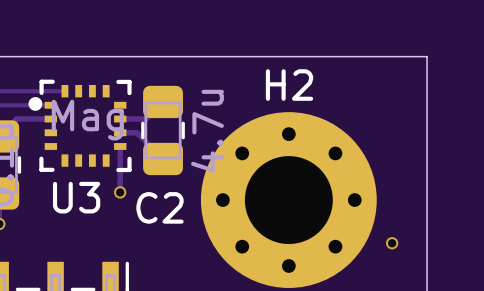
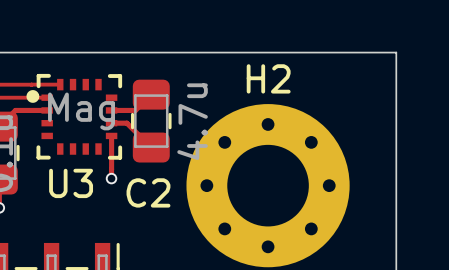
via: (392, 243) -> none

